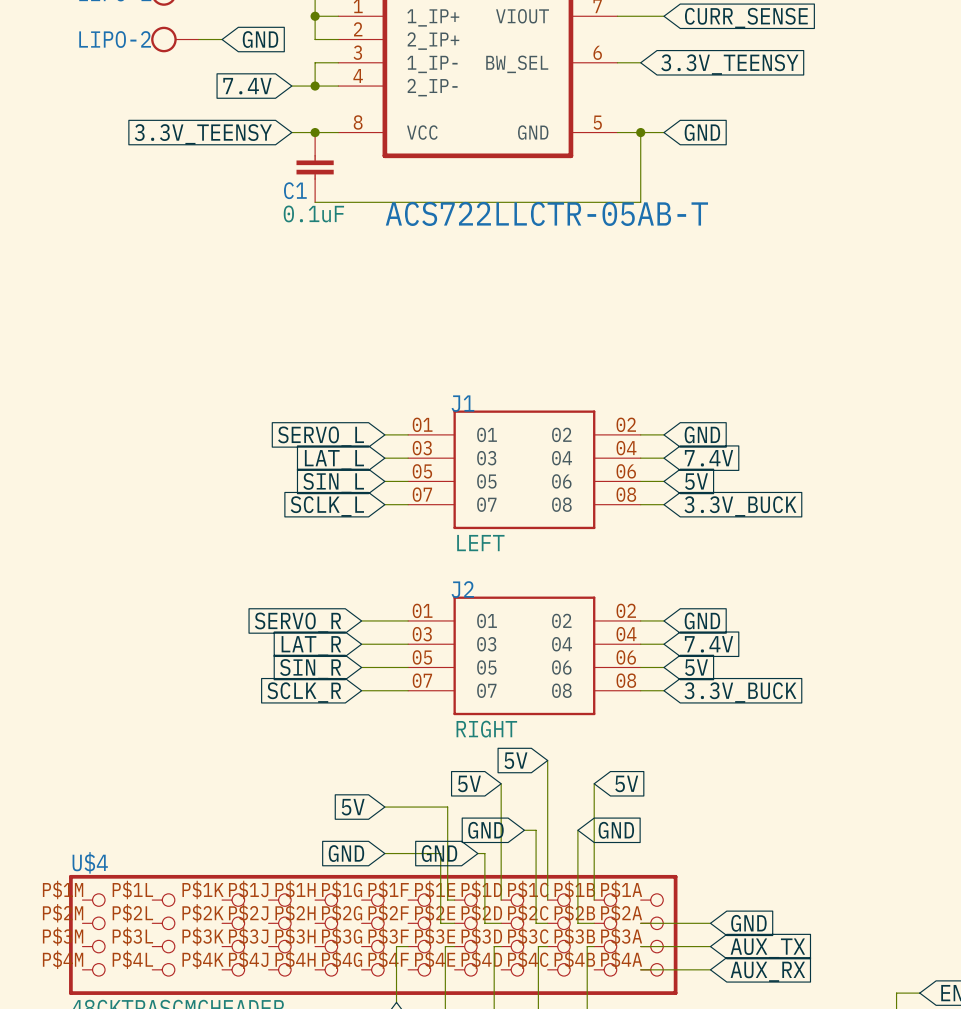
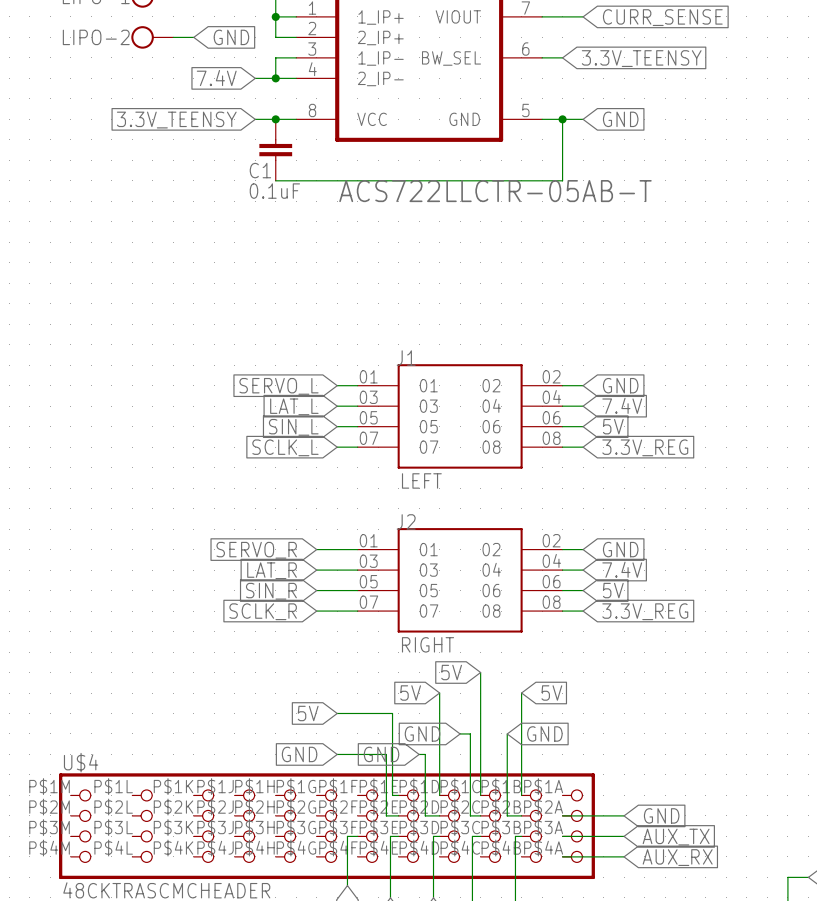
global label: 3.3V_BUCK (740, 506) -> 3.3V_REG (645, 447)
global label: 3.3V_BUCK (740, 692) -> 3.3V_REG (645, 611)

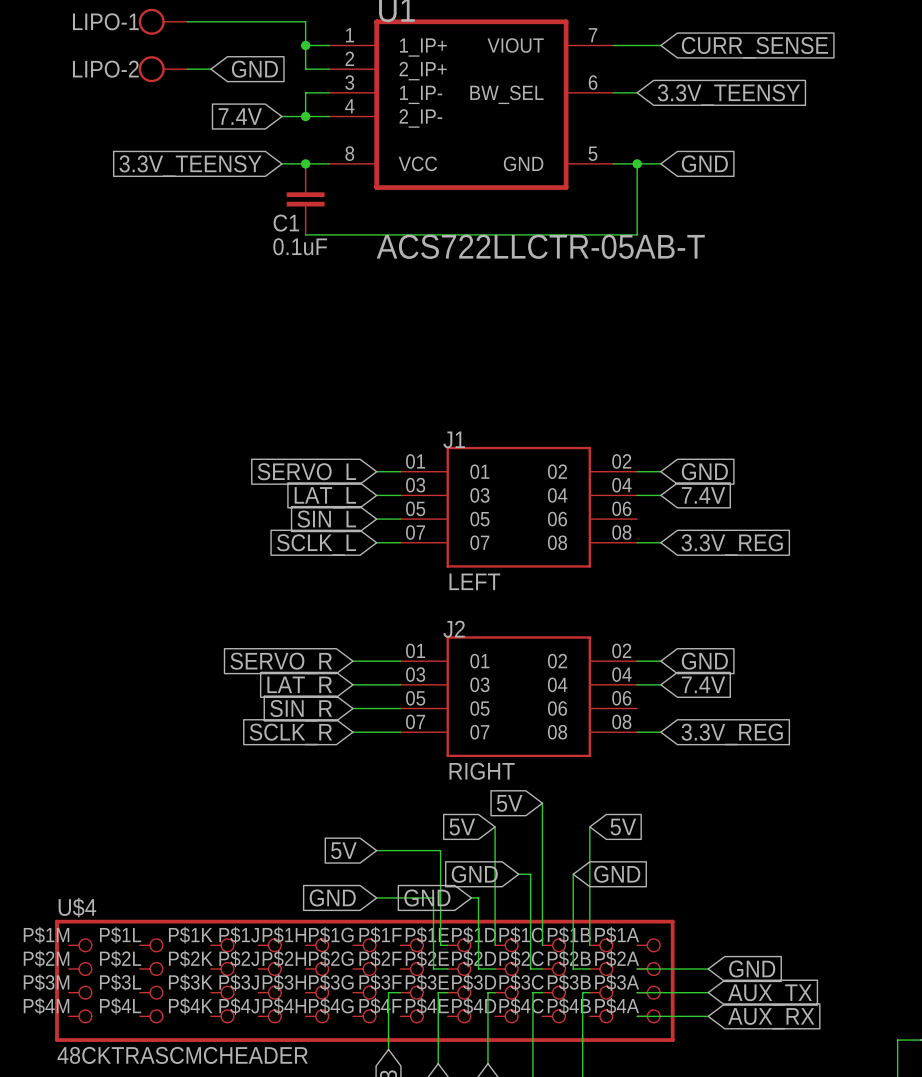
wire: (562, 426) (583, 426) -> none
global label: 5V (613, 426) -> none
wire: (562, 590) (583, 590) -> none
global label: 5V (613, 590) -> none

